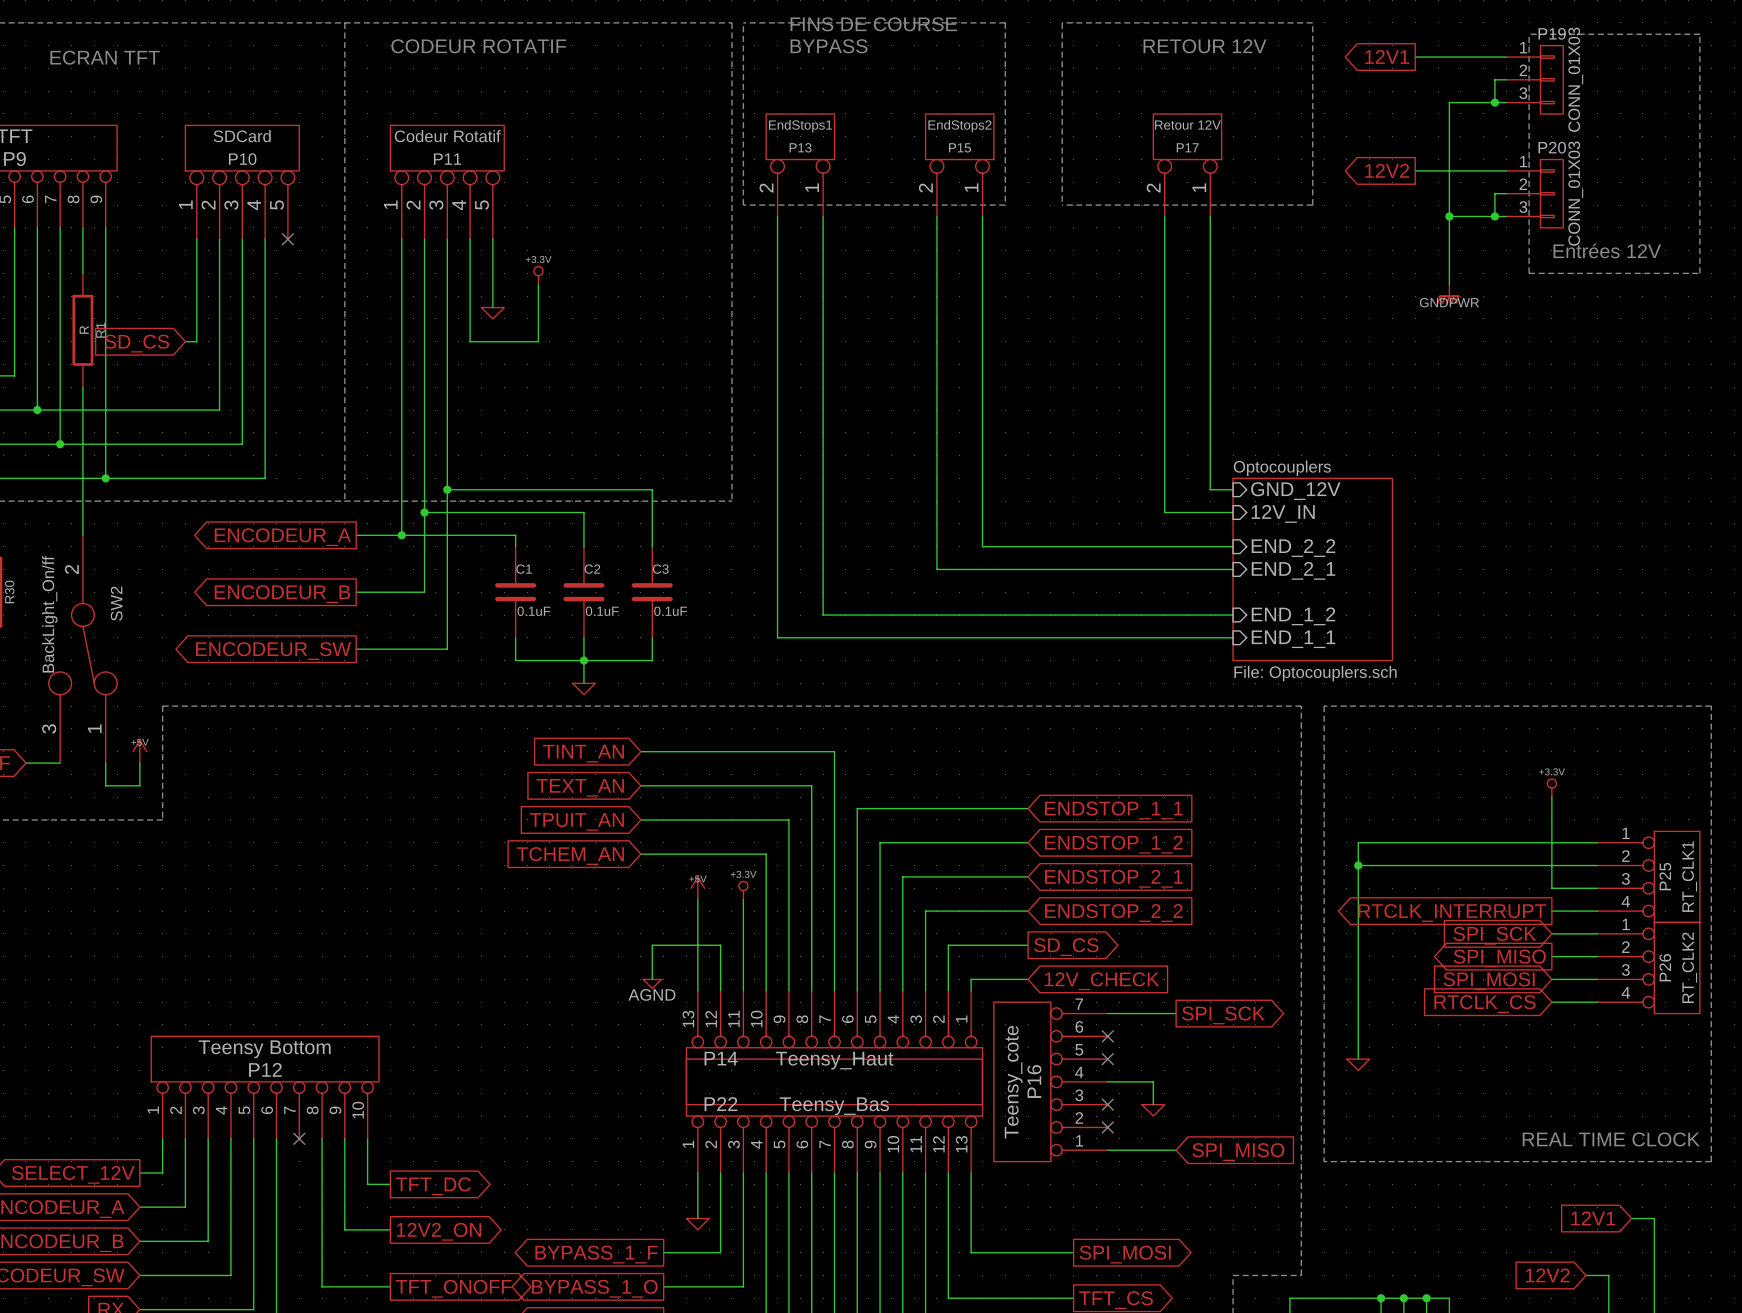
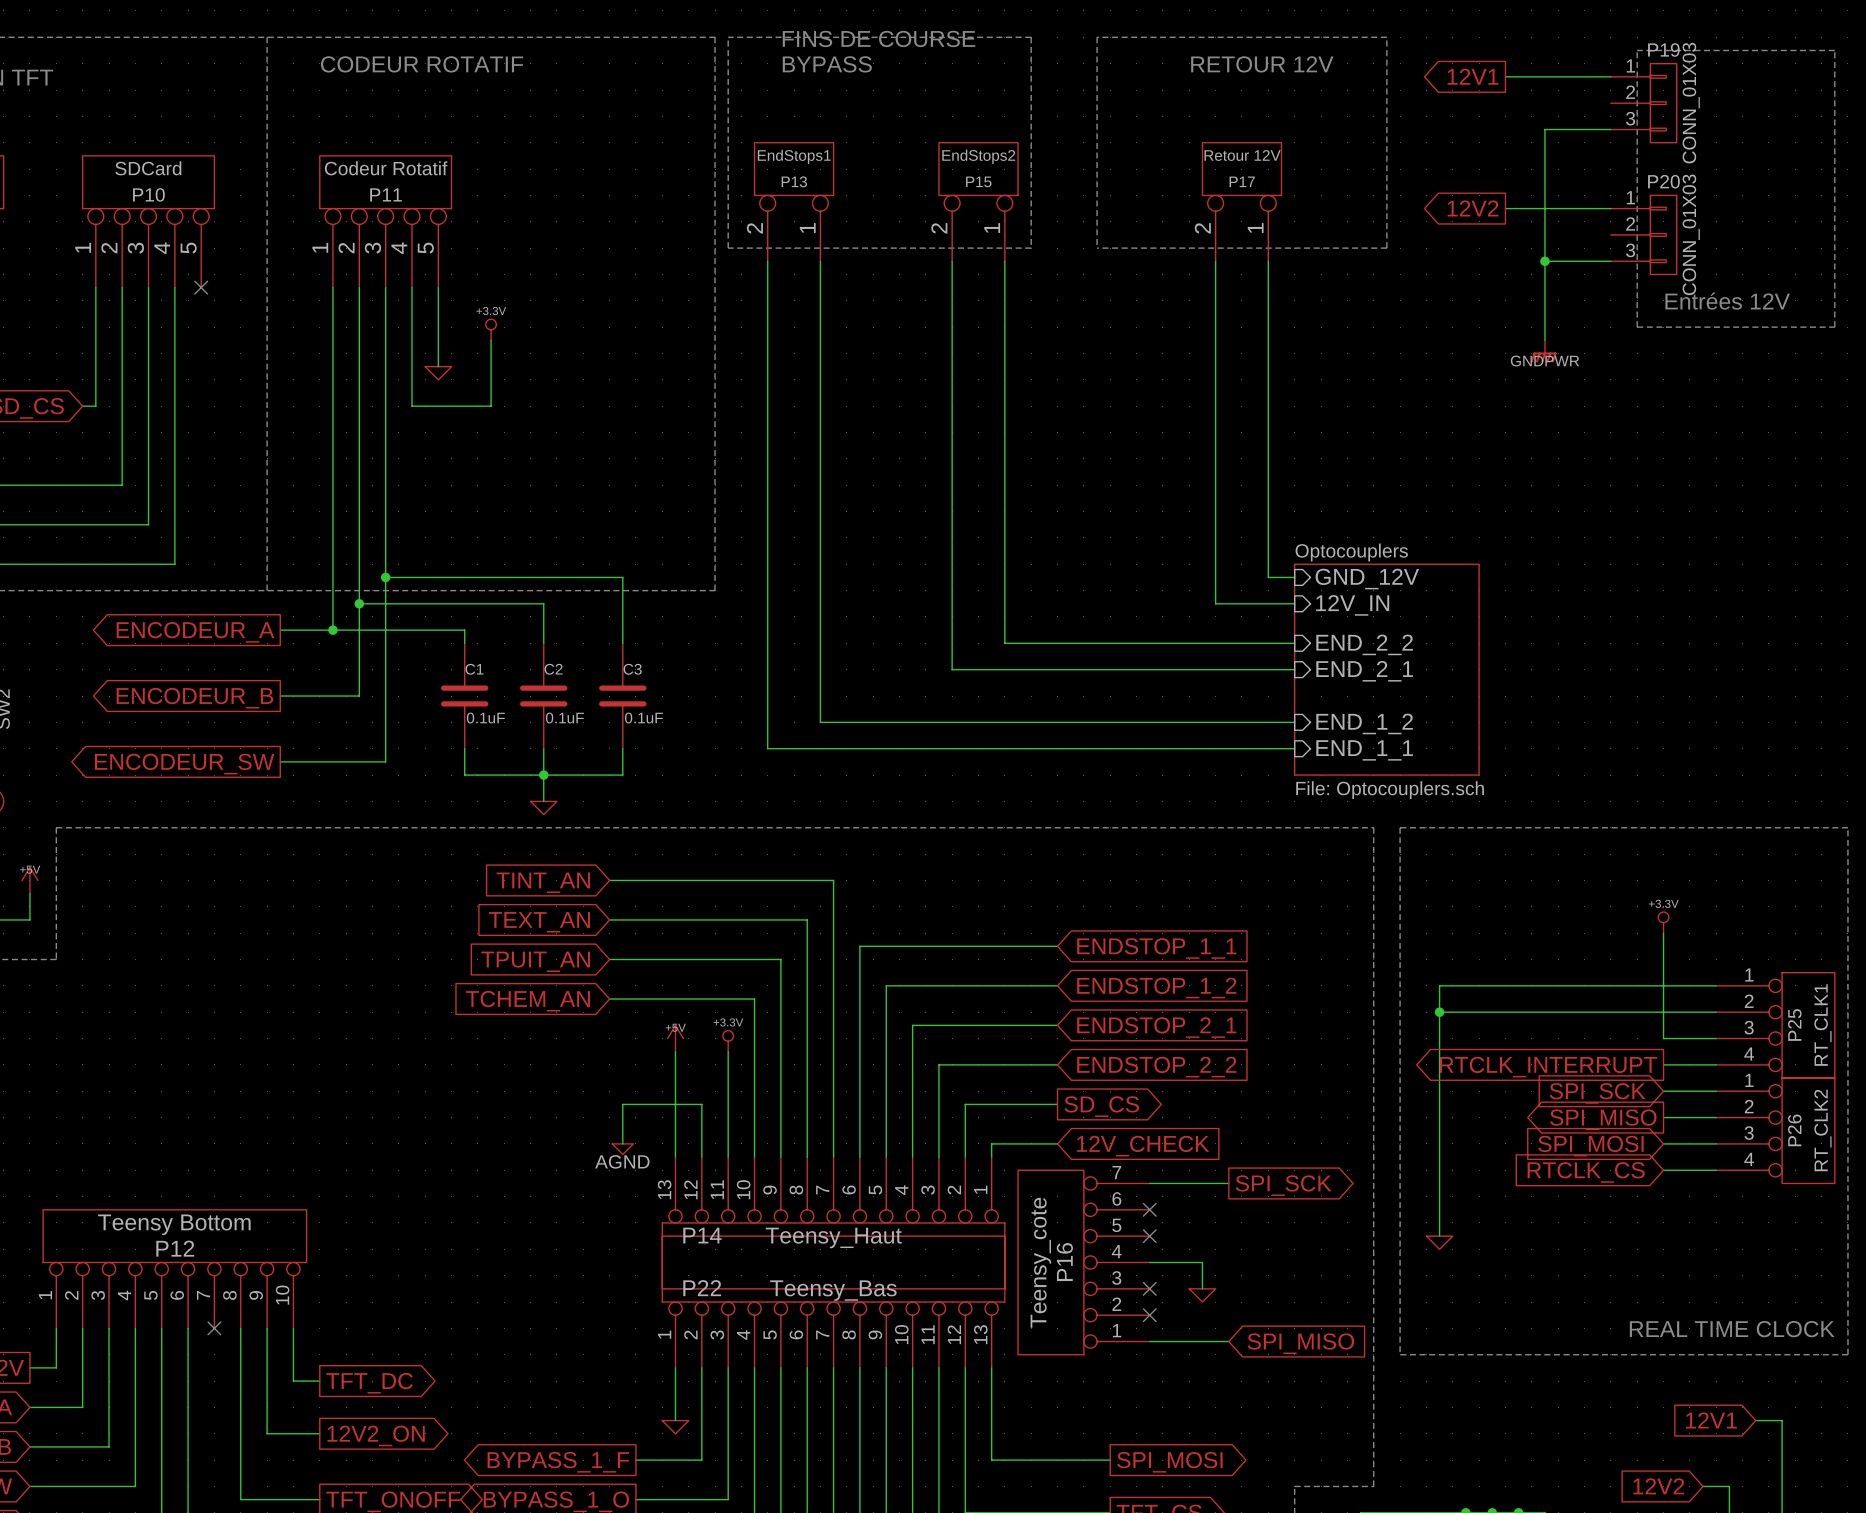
wire: (1506, 79) (1494, 79) (1494, 102) -> none
junction: (1494, 102) -> none
wire: (1506, 193) (1494, 193) (1494, 216) -> none
junction: (1494, 216) -> none

